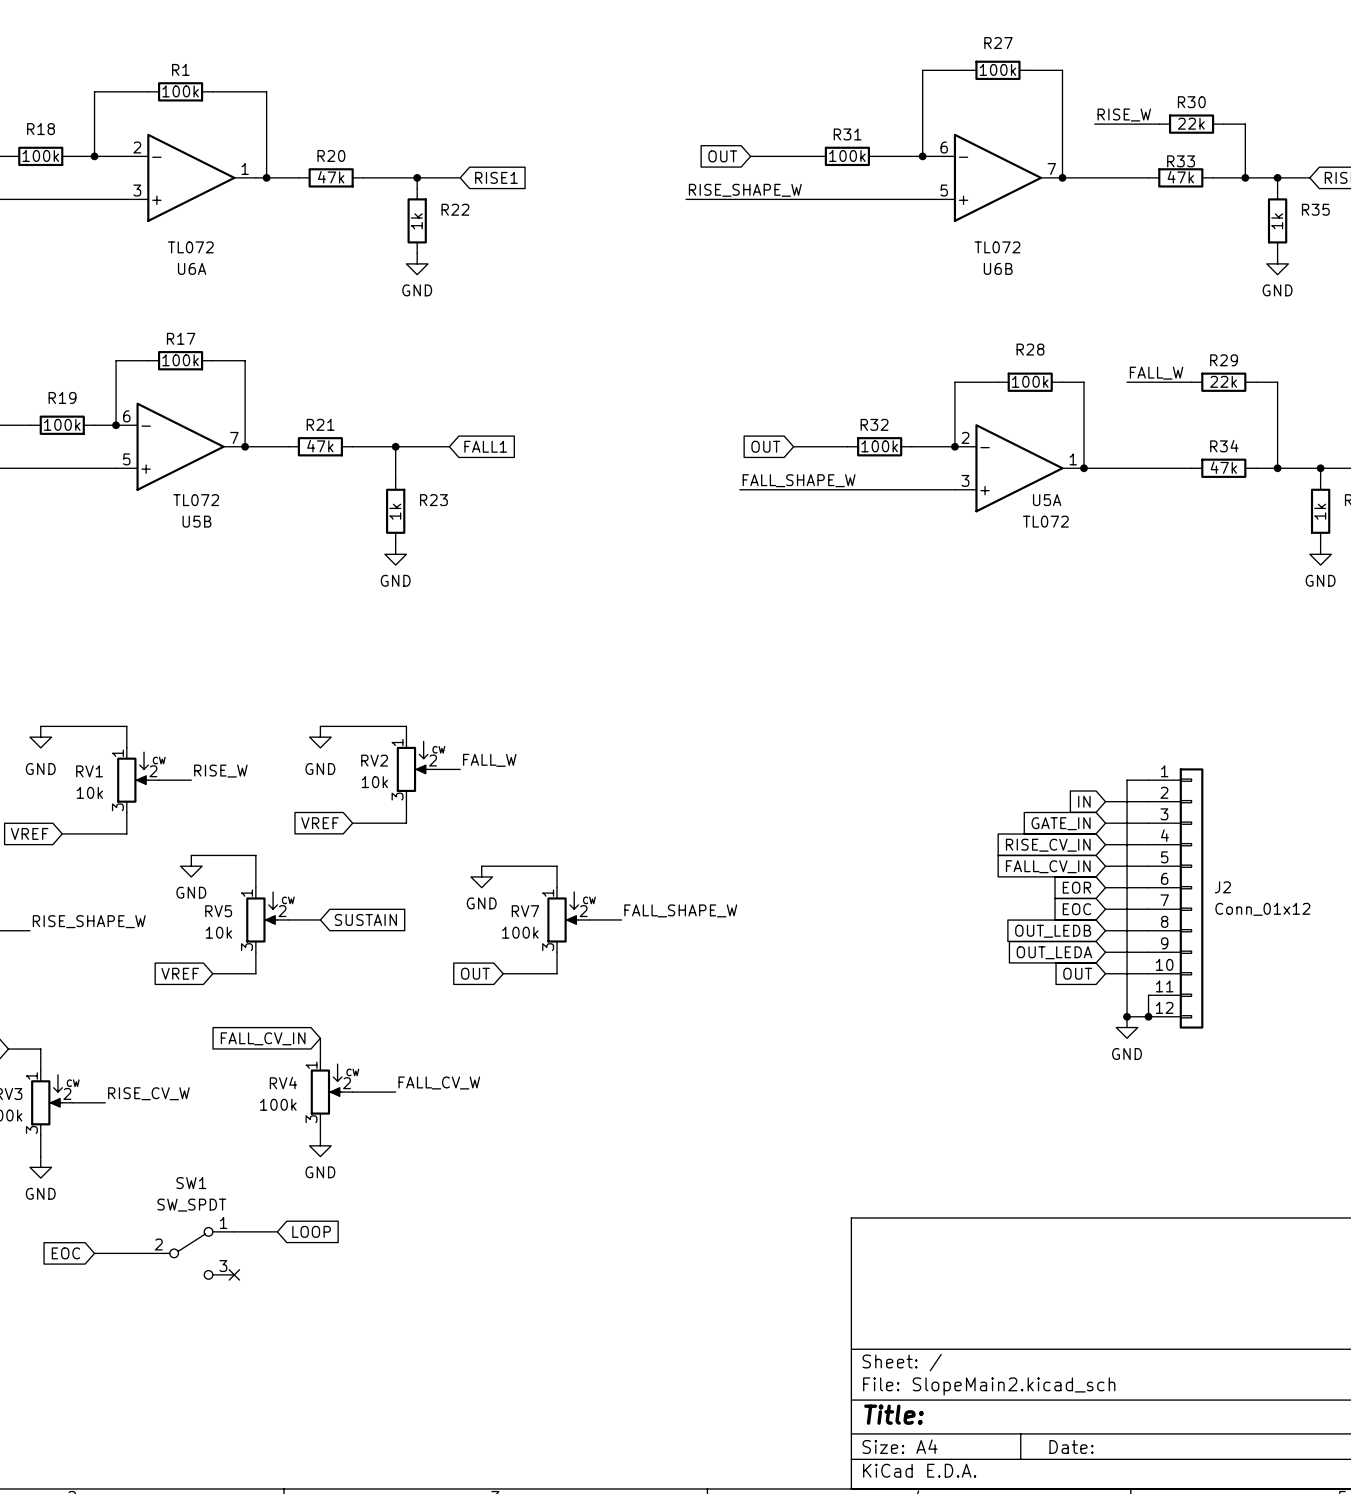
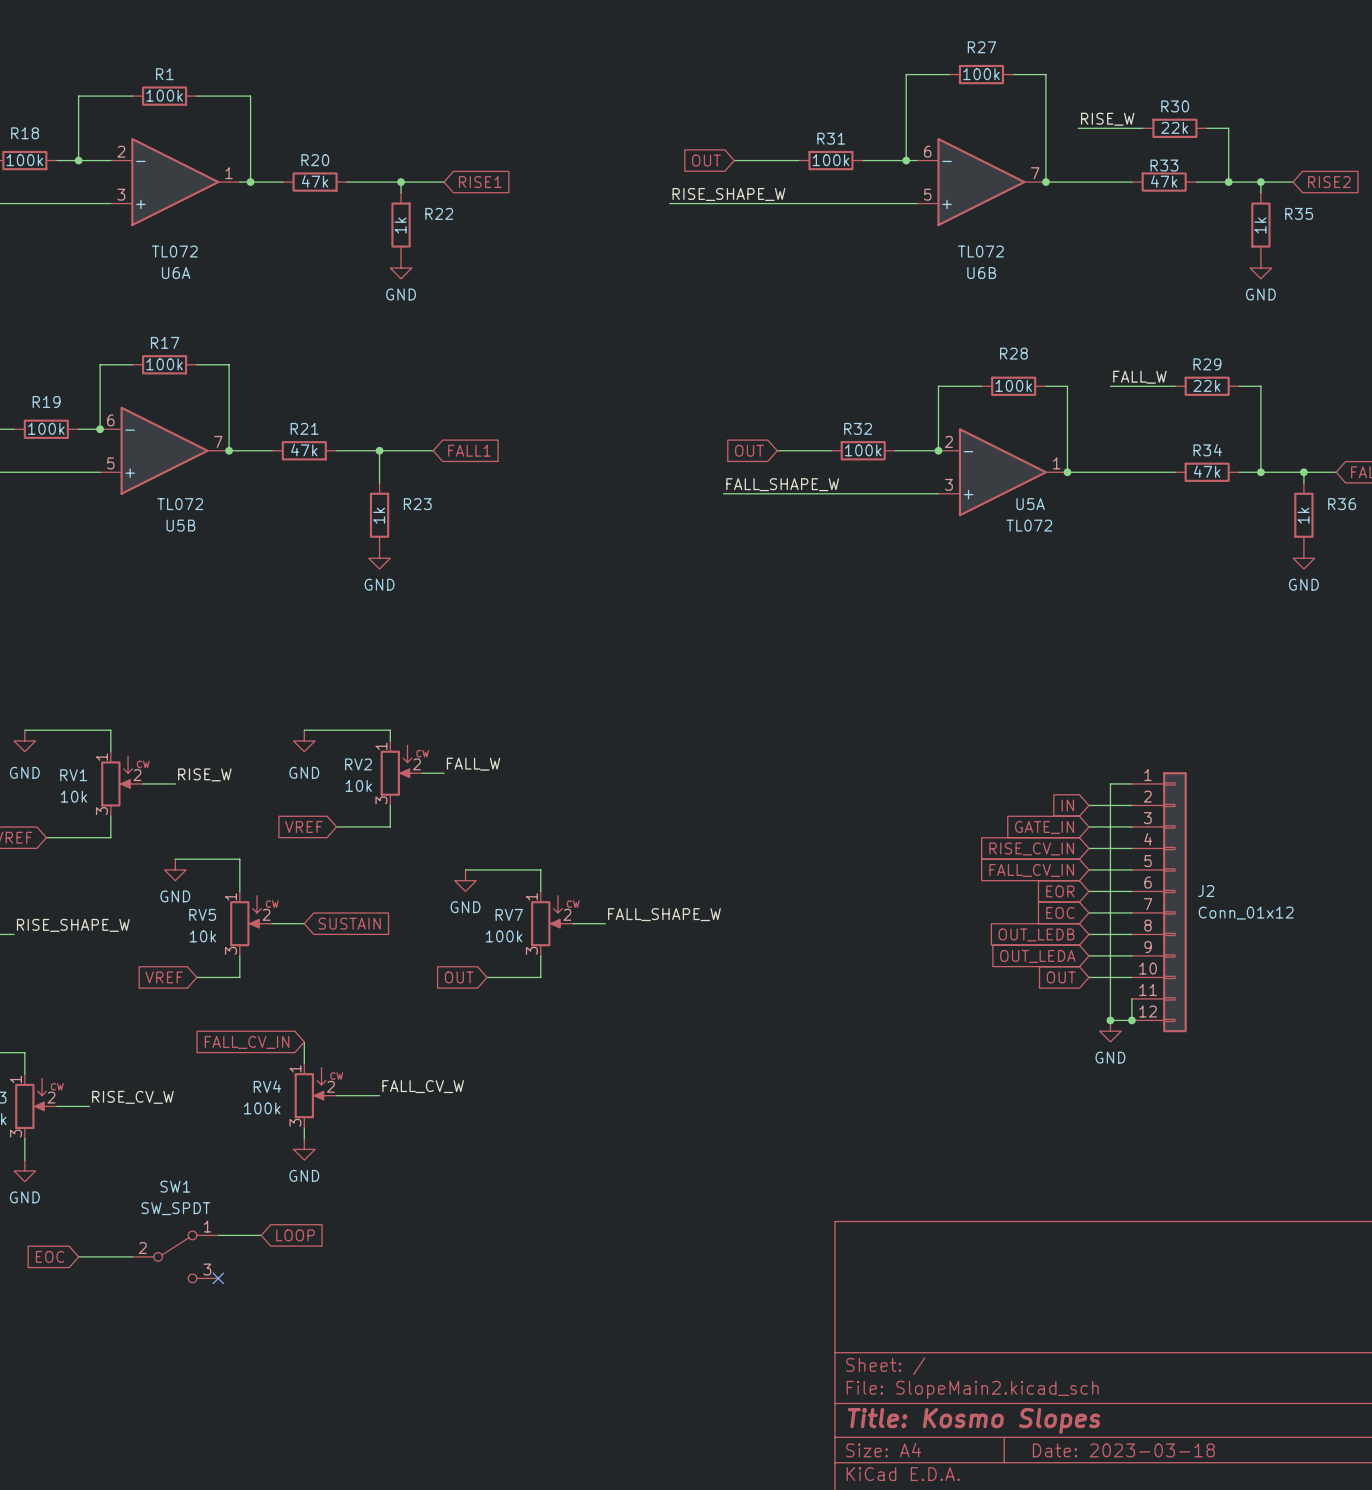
title block: Title: (893, 1414) -> Title: Kosmo Slopes (973, 1420)
title block: Date: (1071, 1447) -> Date: 2023-03-18 (1123, 1450)

